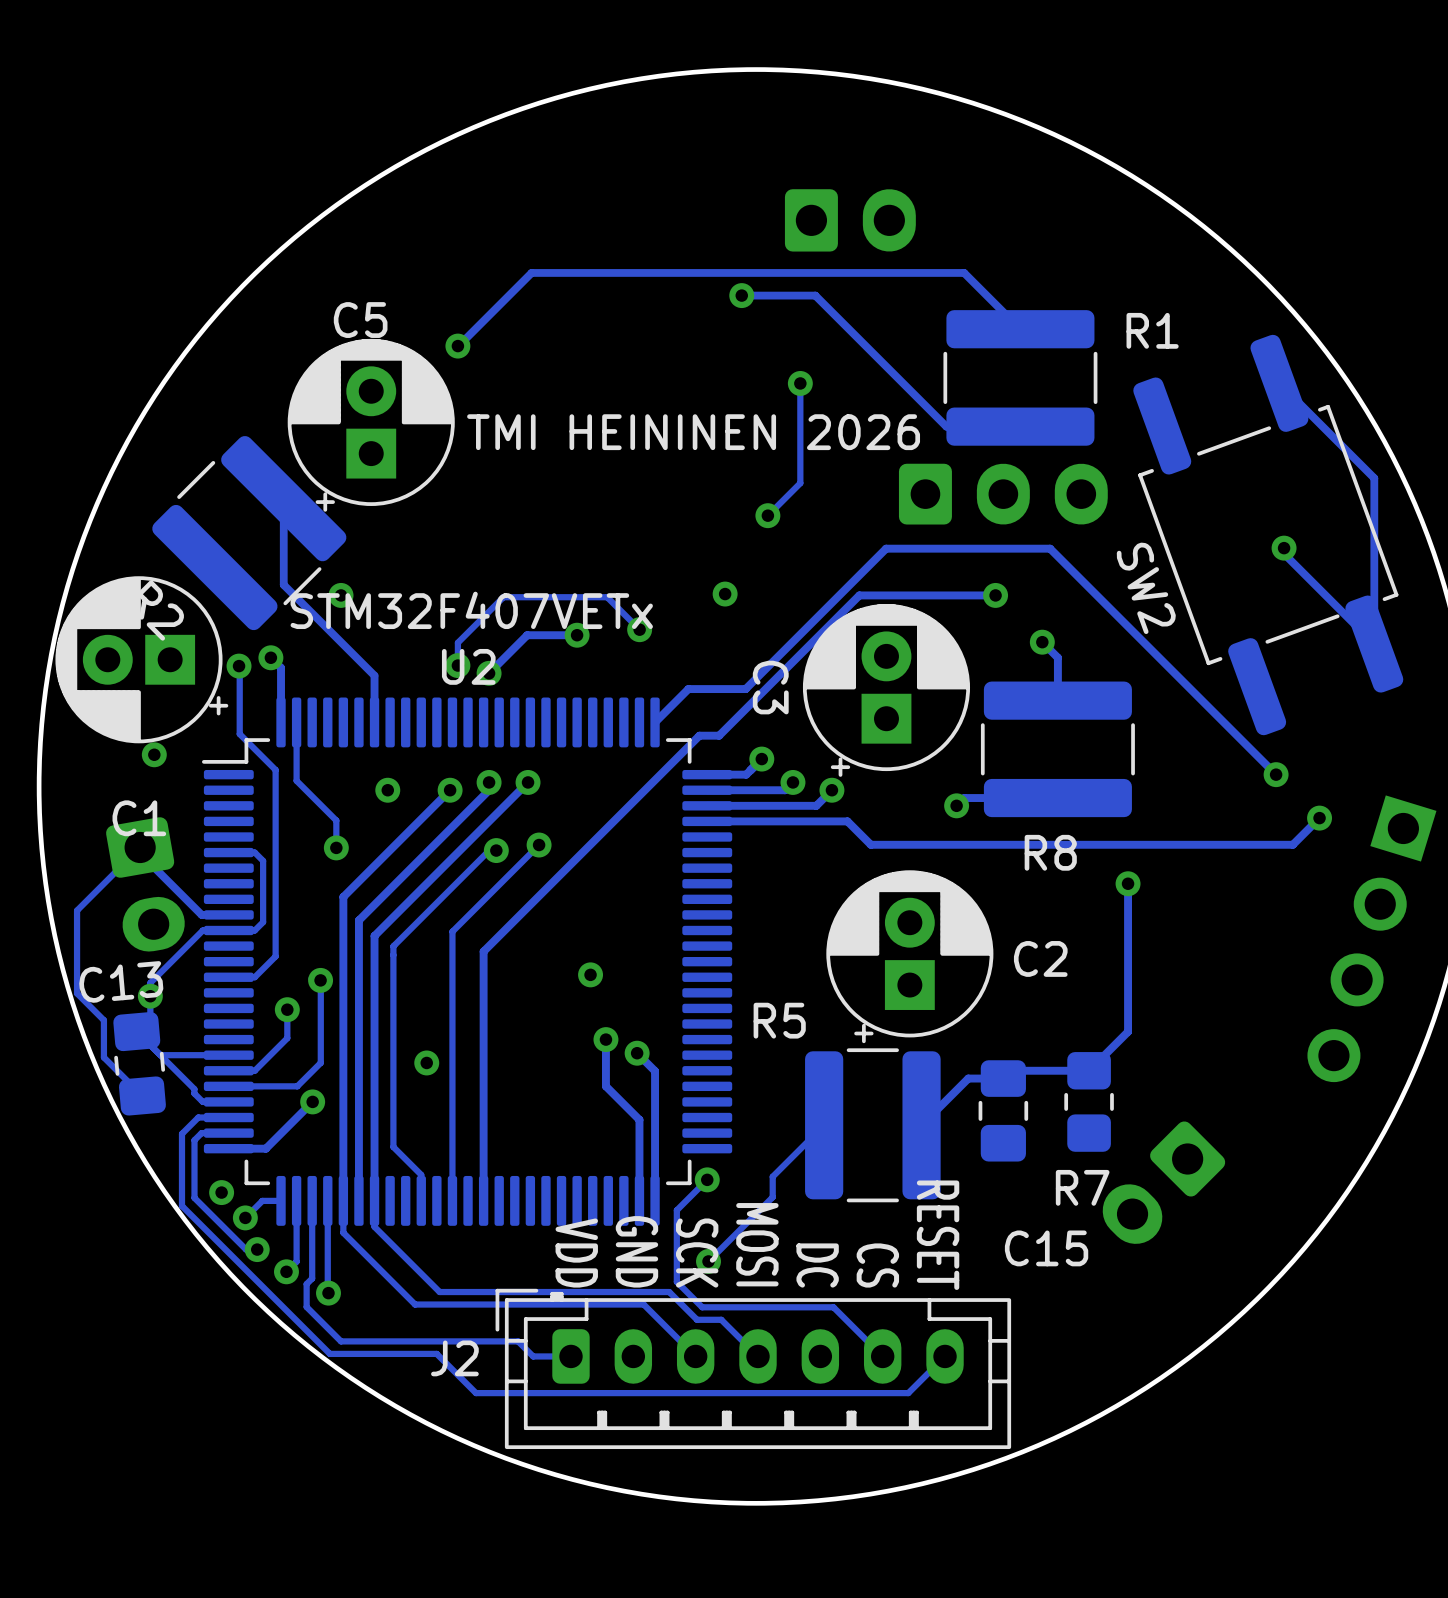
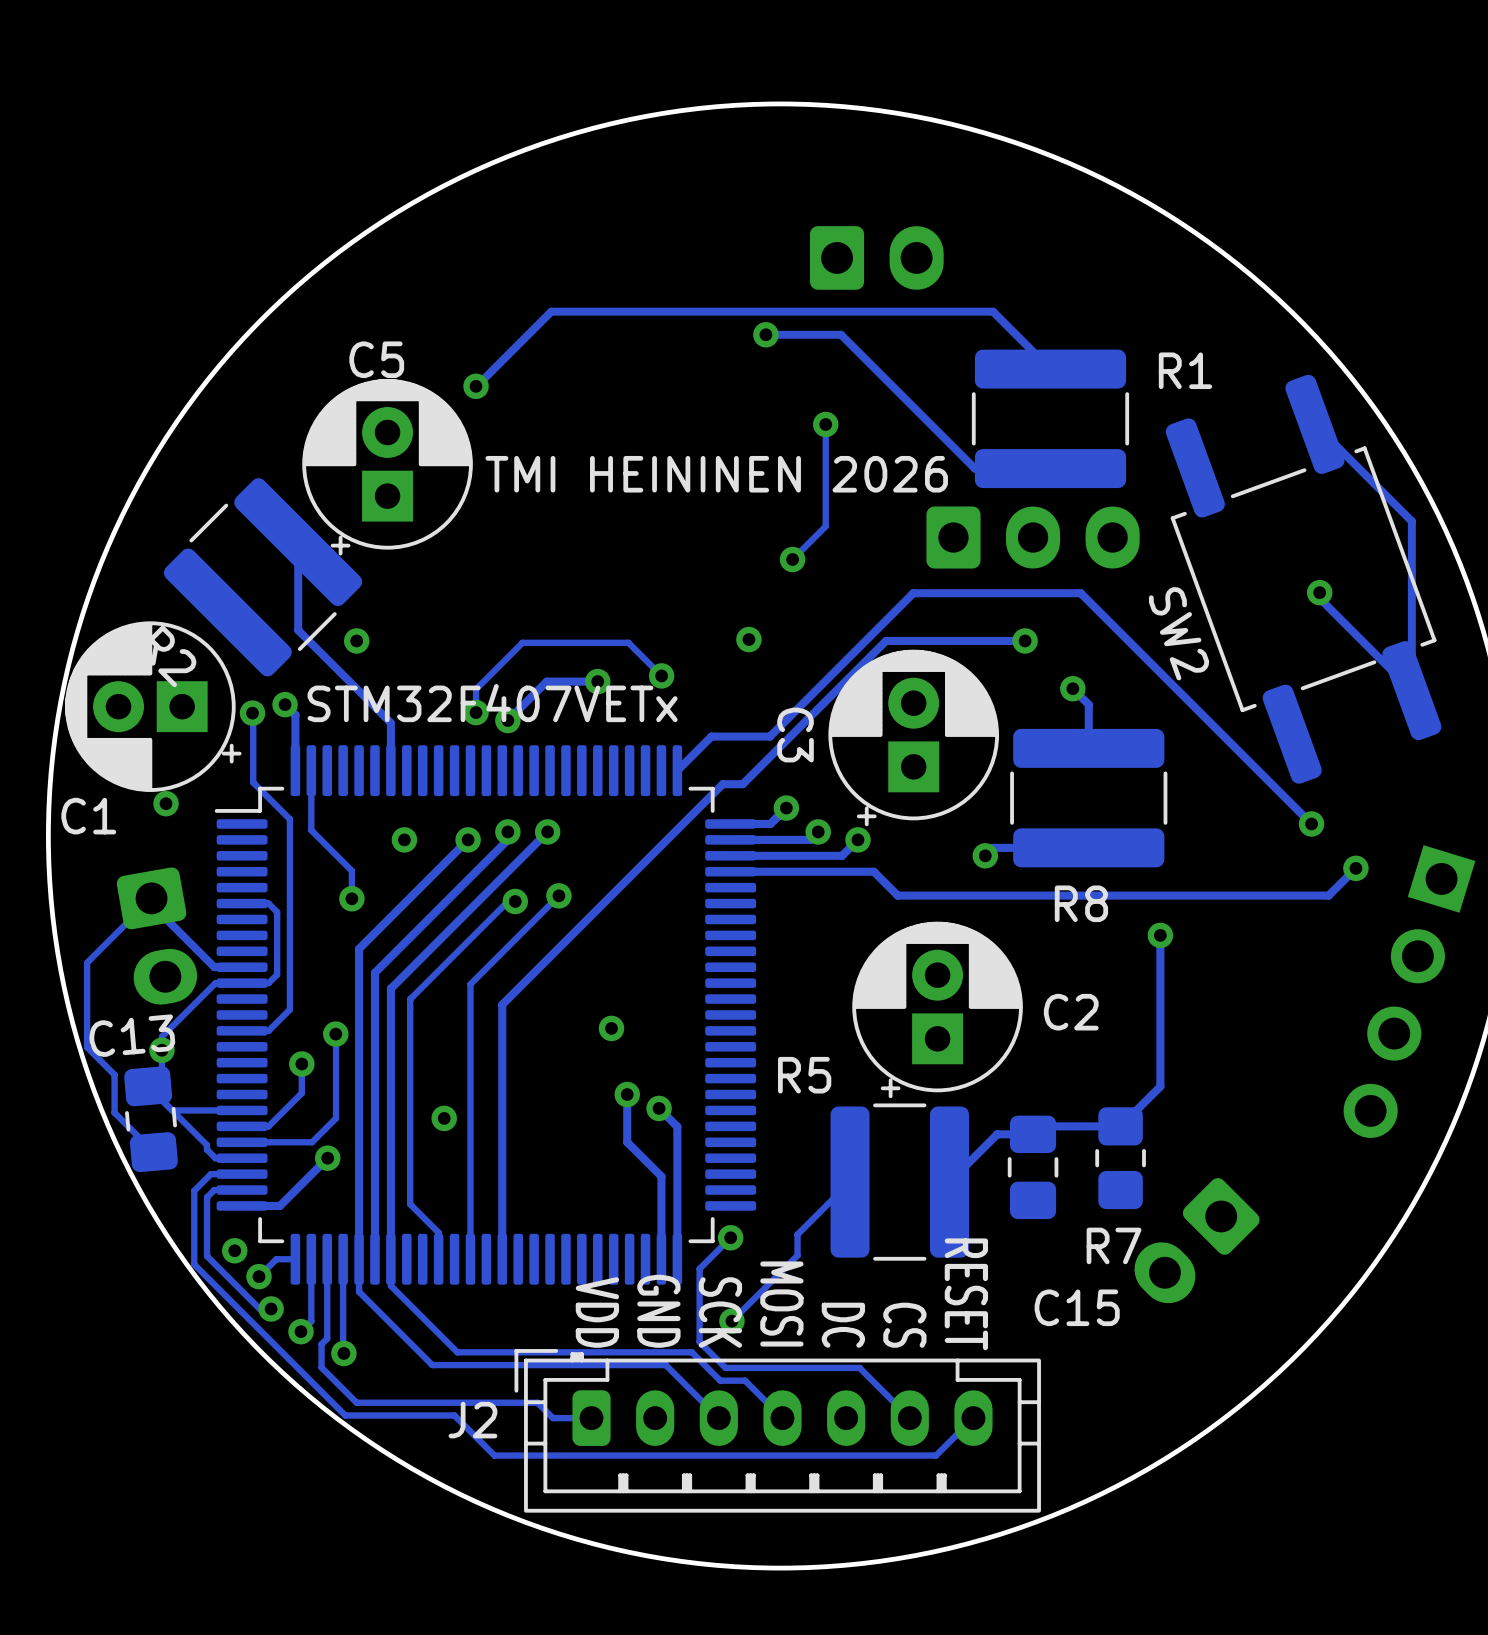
U2 value position: STM32F407VETx (471, 610) -> STM32F407VETx (492, 703)
U2 name: U2 (468, 666) -> none
C1 name position: C1 (139, 818) -> C1 (88, 816)

